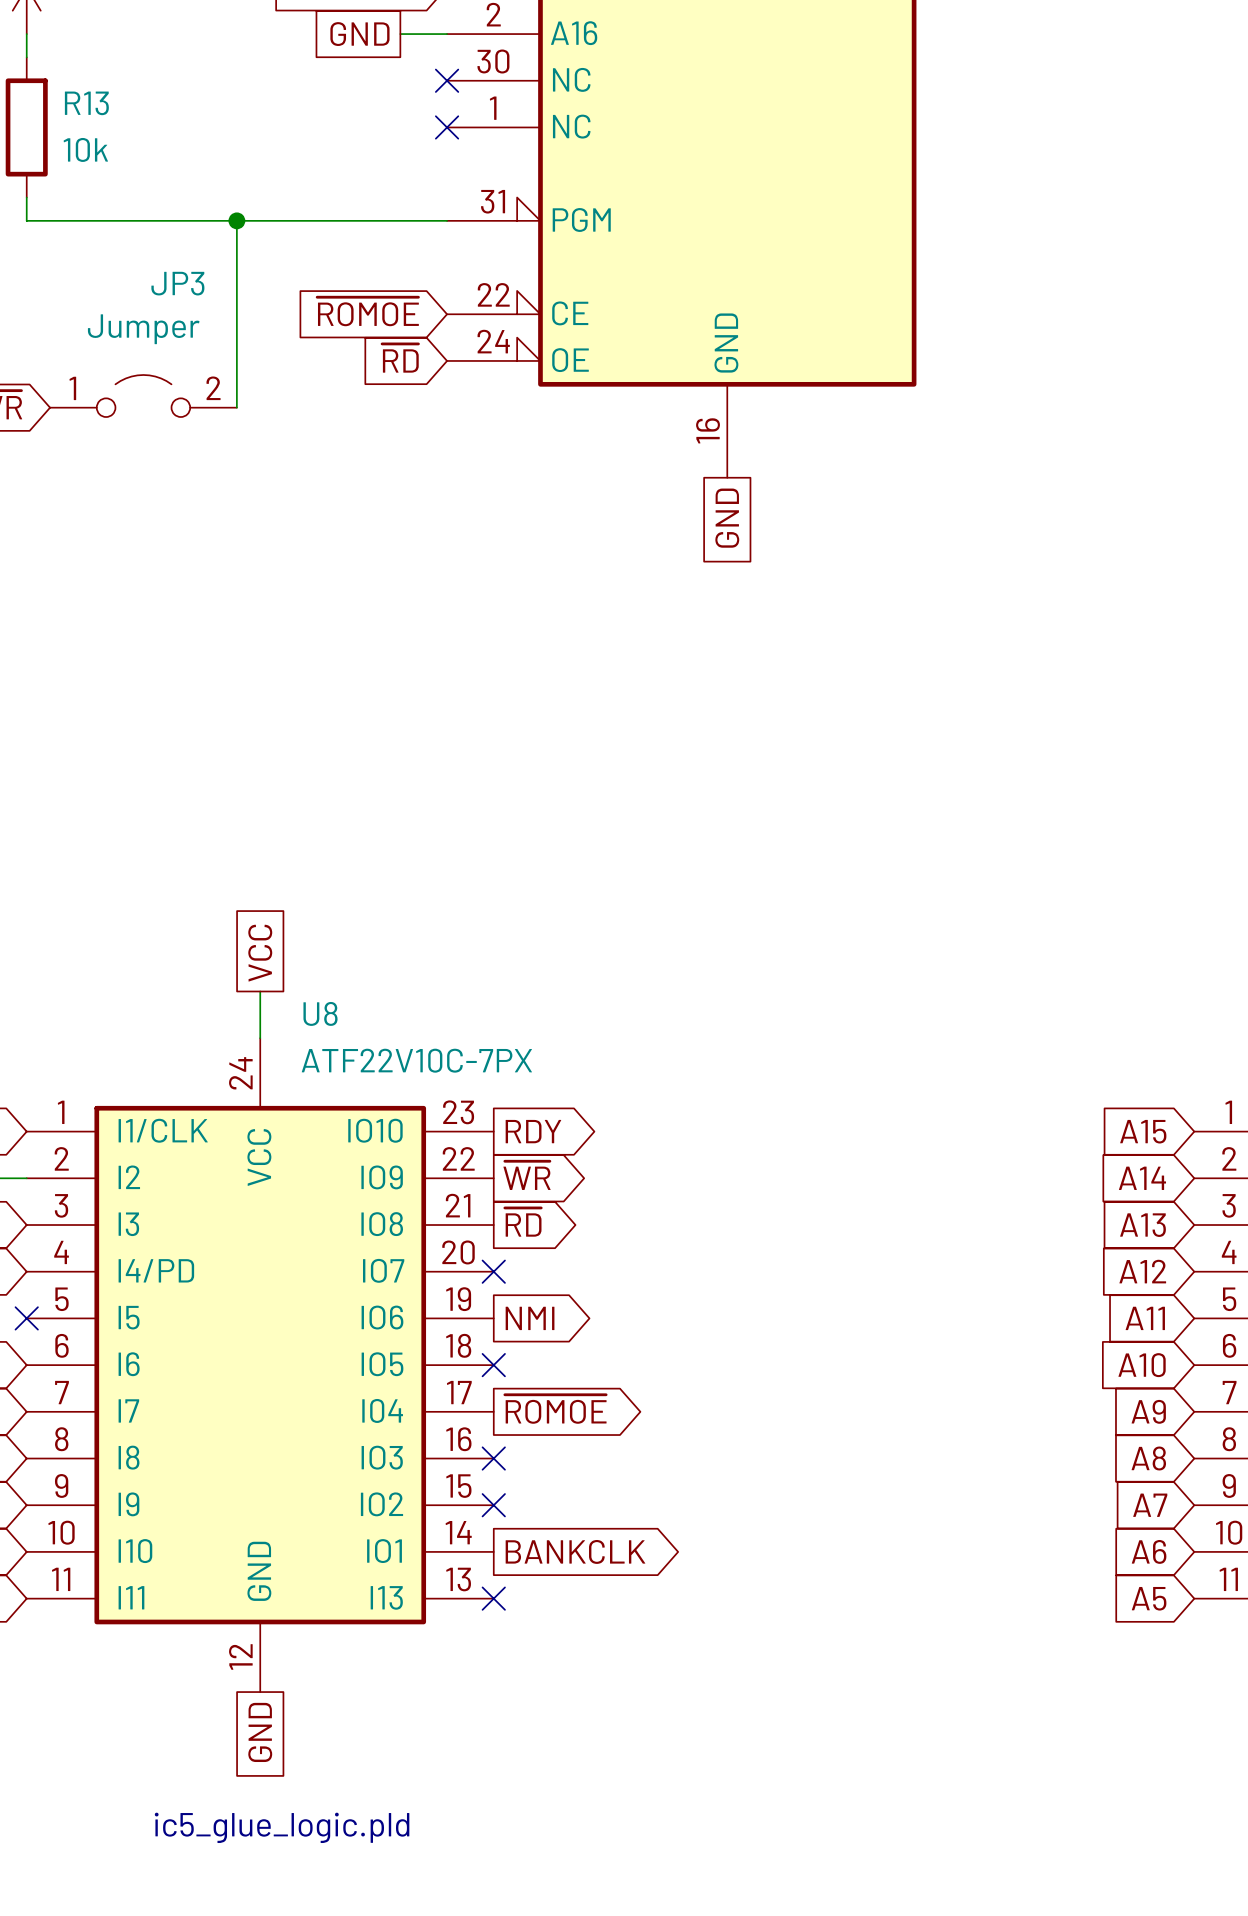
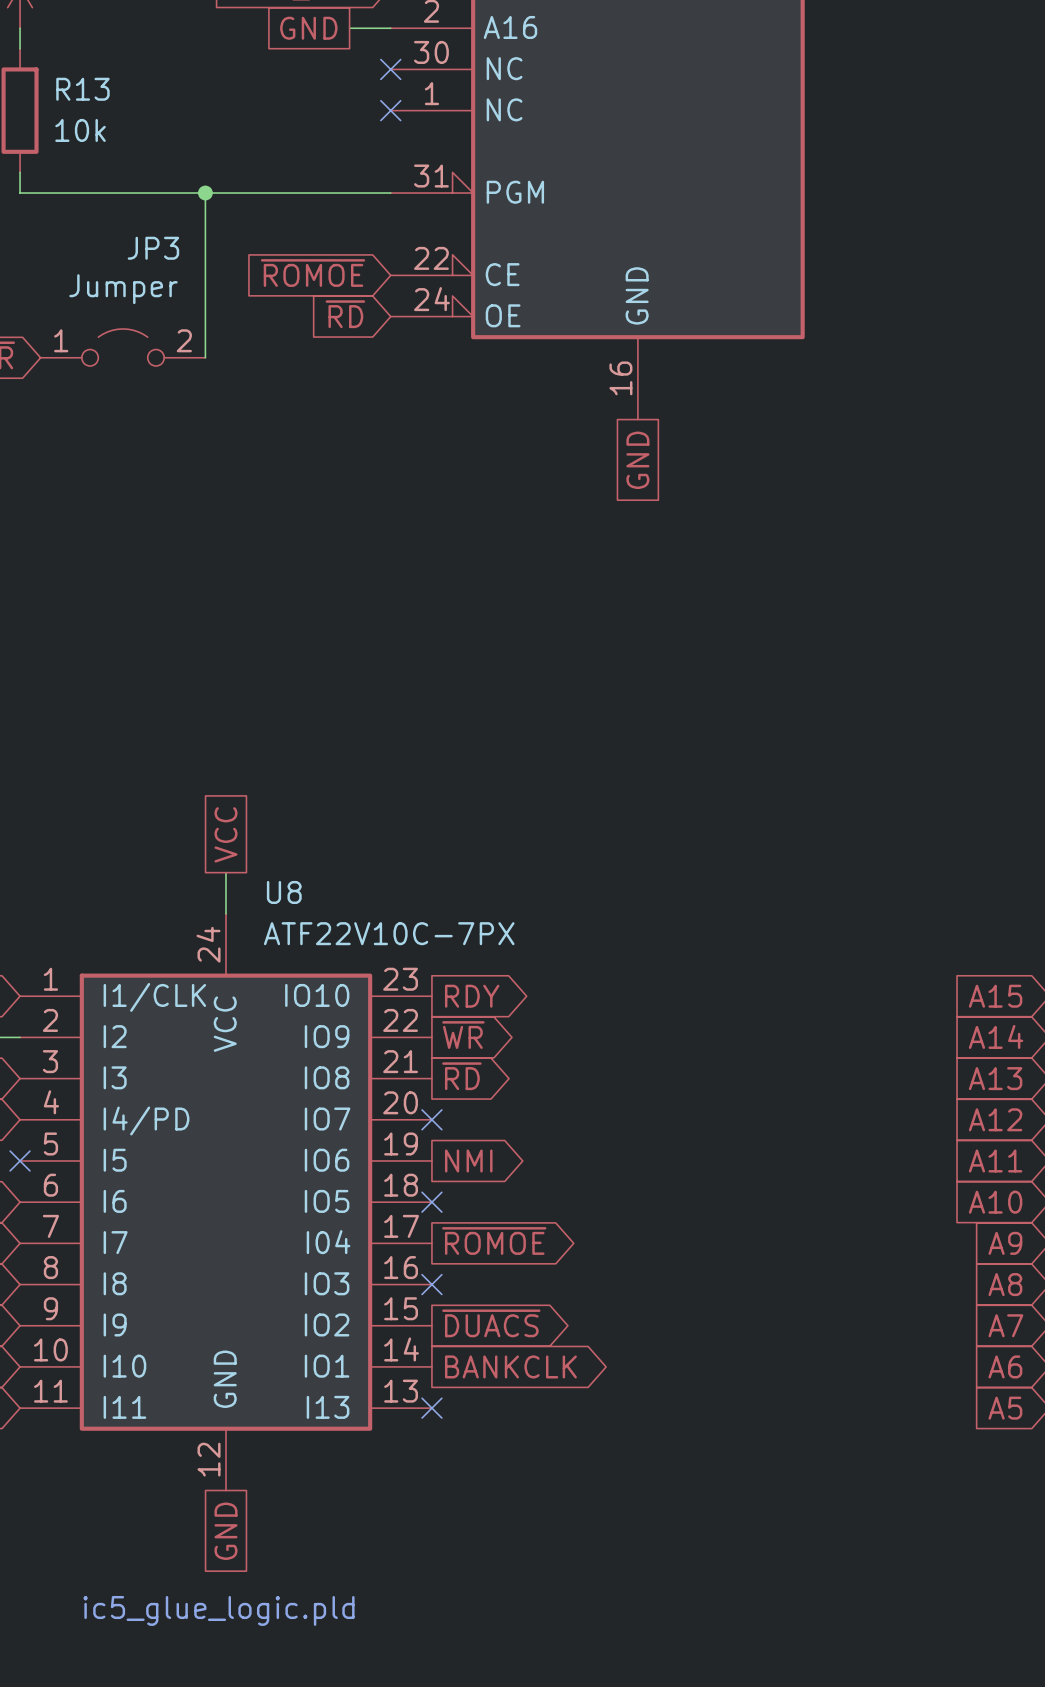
global label: none -> ~{DUACS} (491, 1323)
no-connect mark: (493, 1505) -> none

